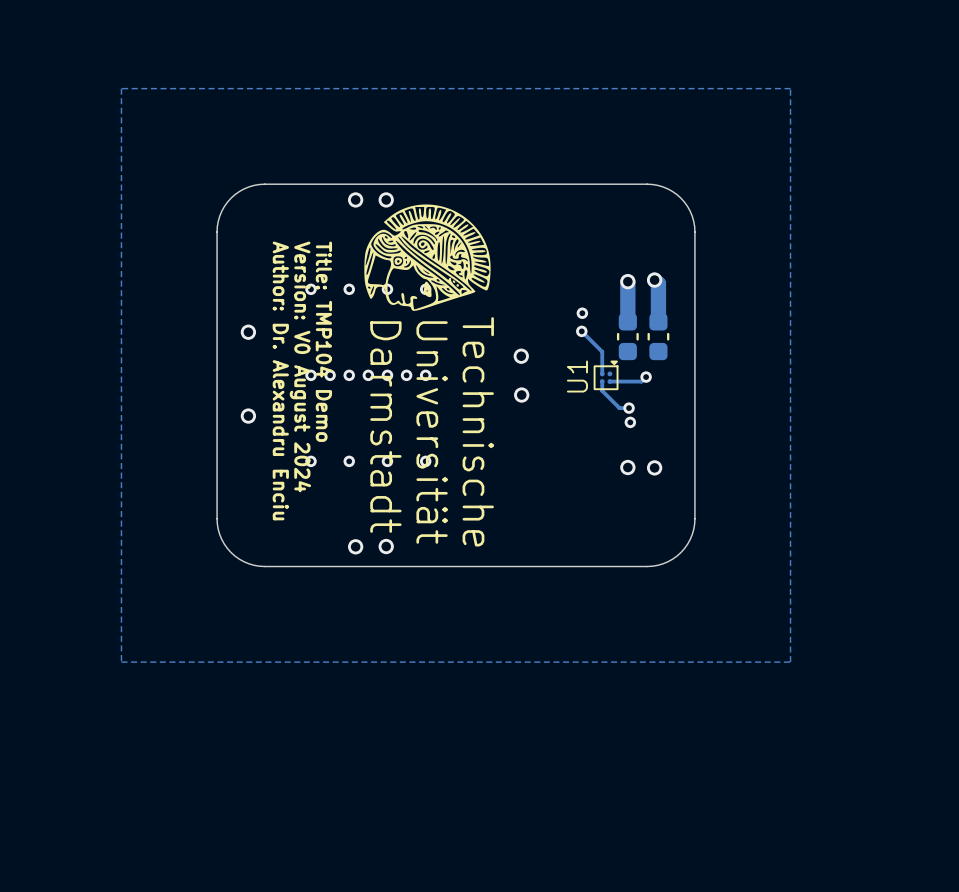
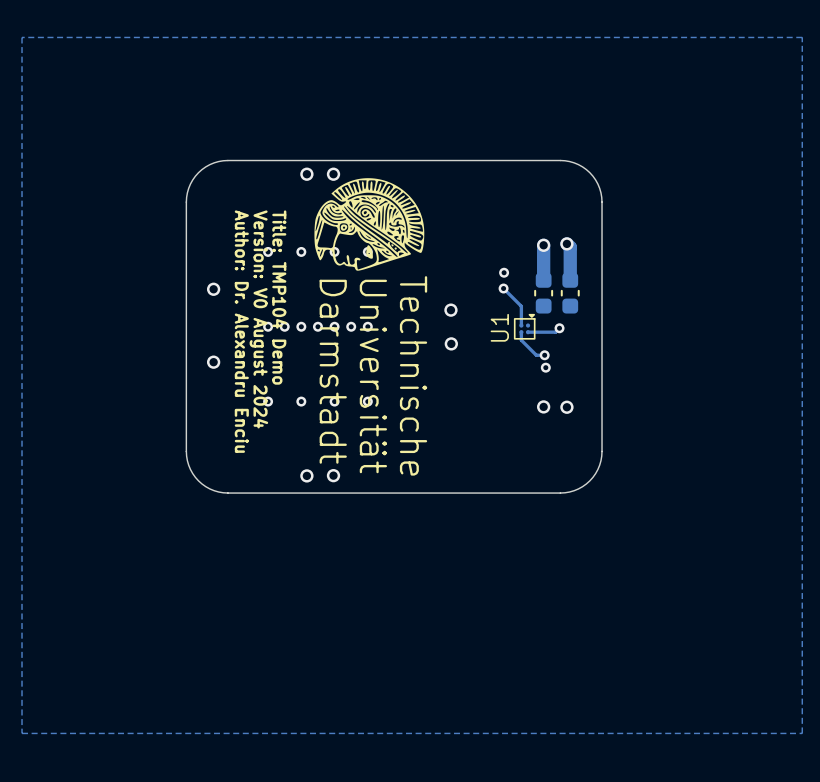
zone outline: (790, 88) (121, 88) (121, 662) (790, 662) (790, 88) -> (802, 37) (802, 733) (22, 733) (22, 37) (802, 37)

